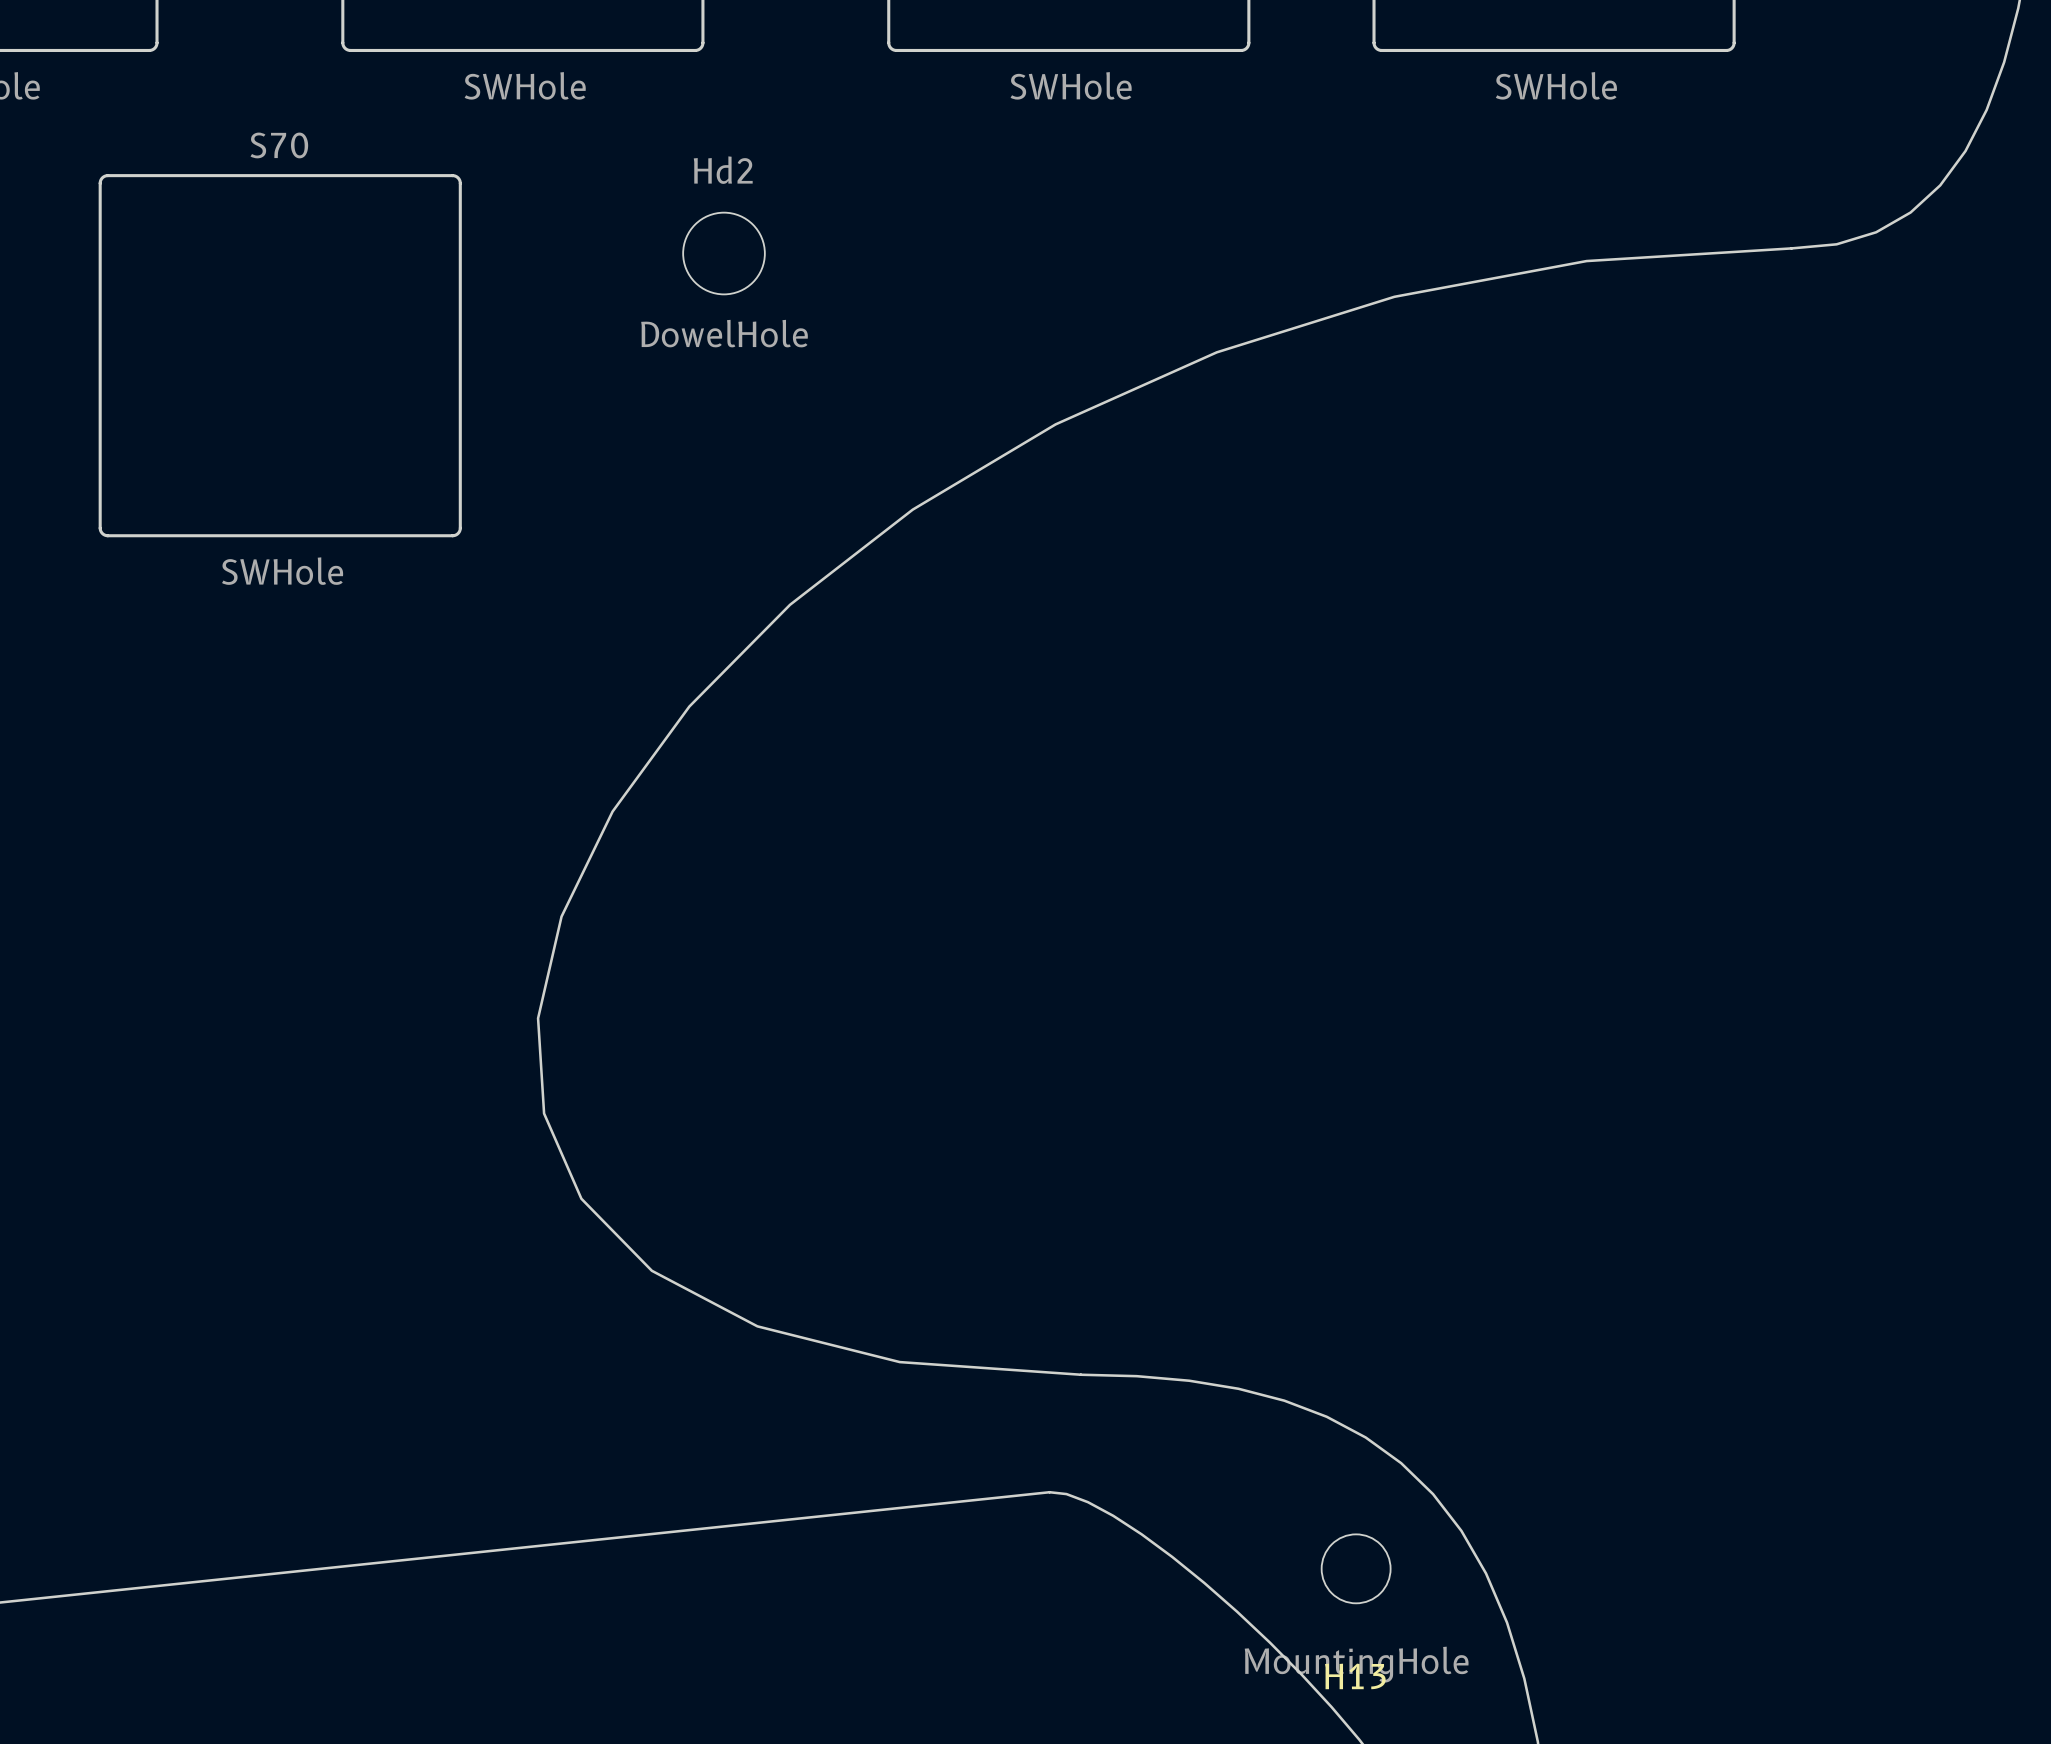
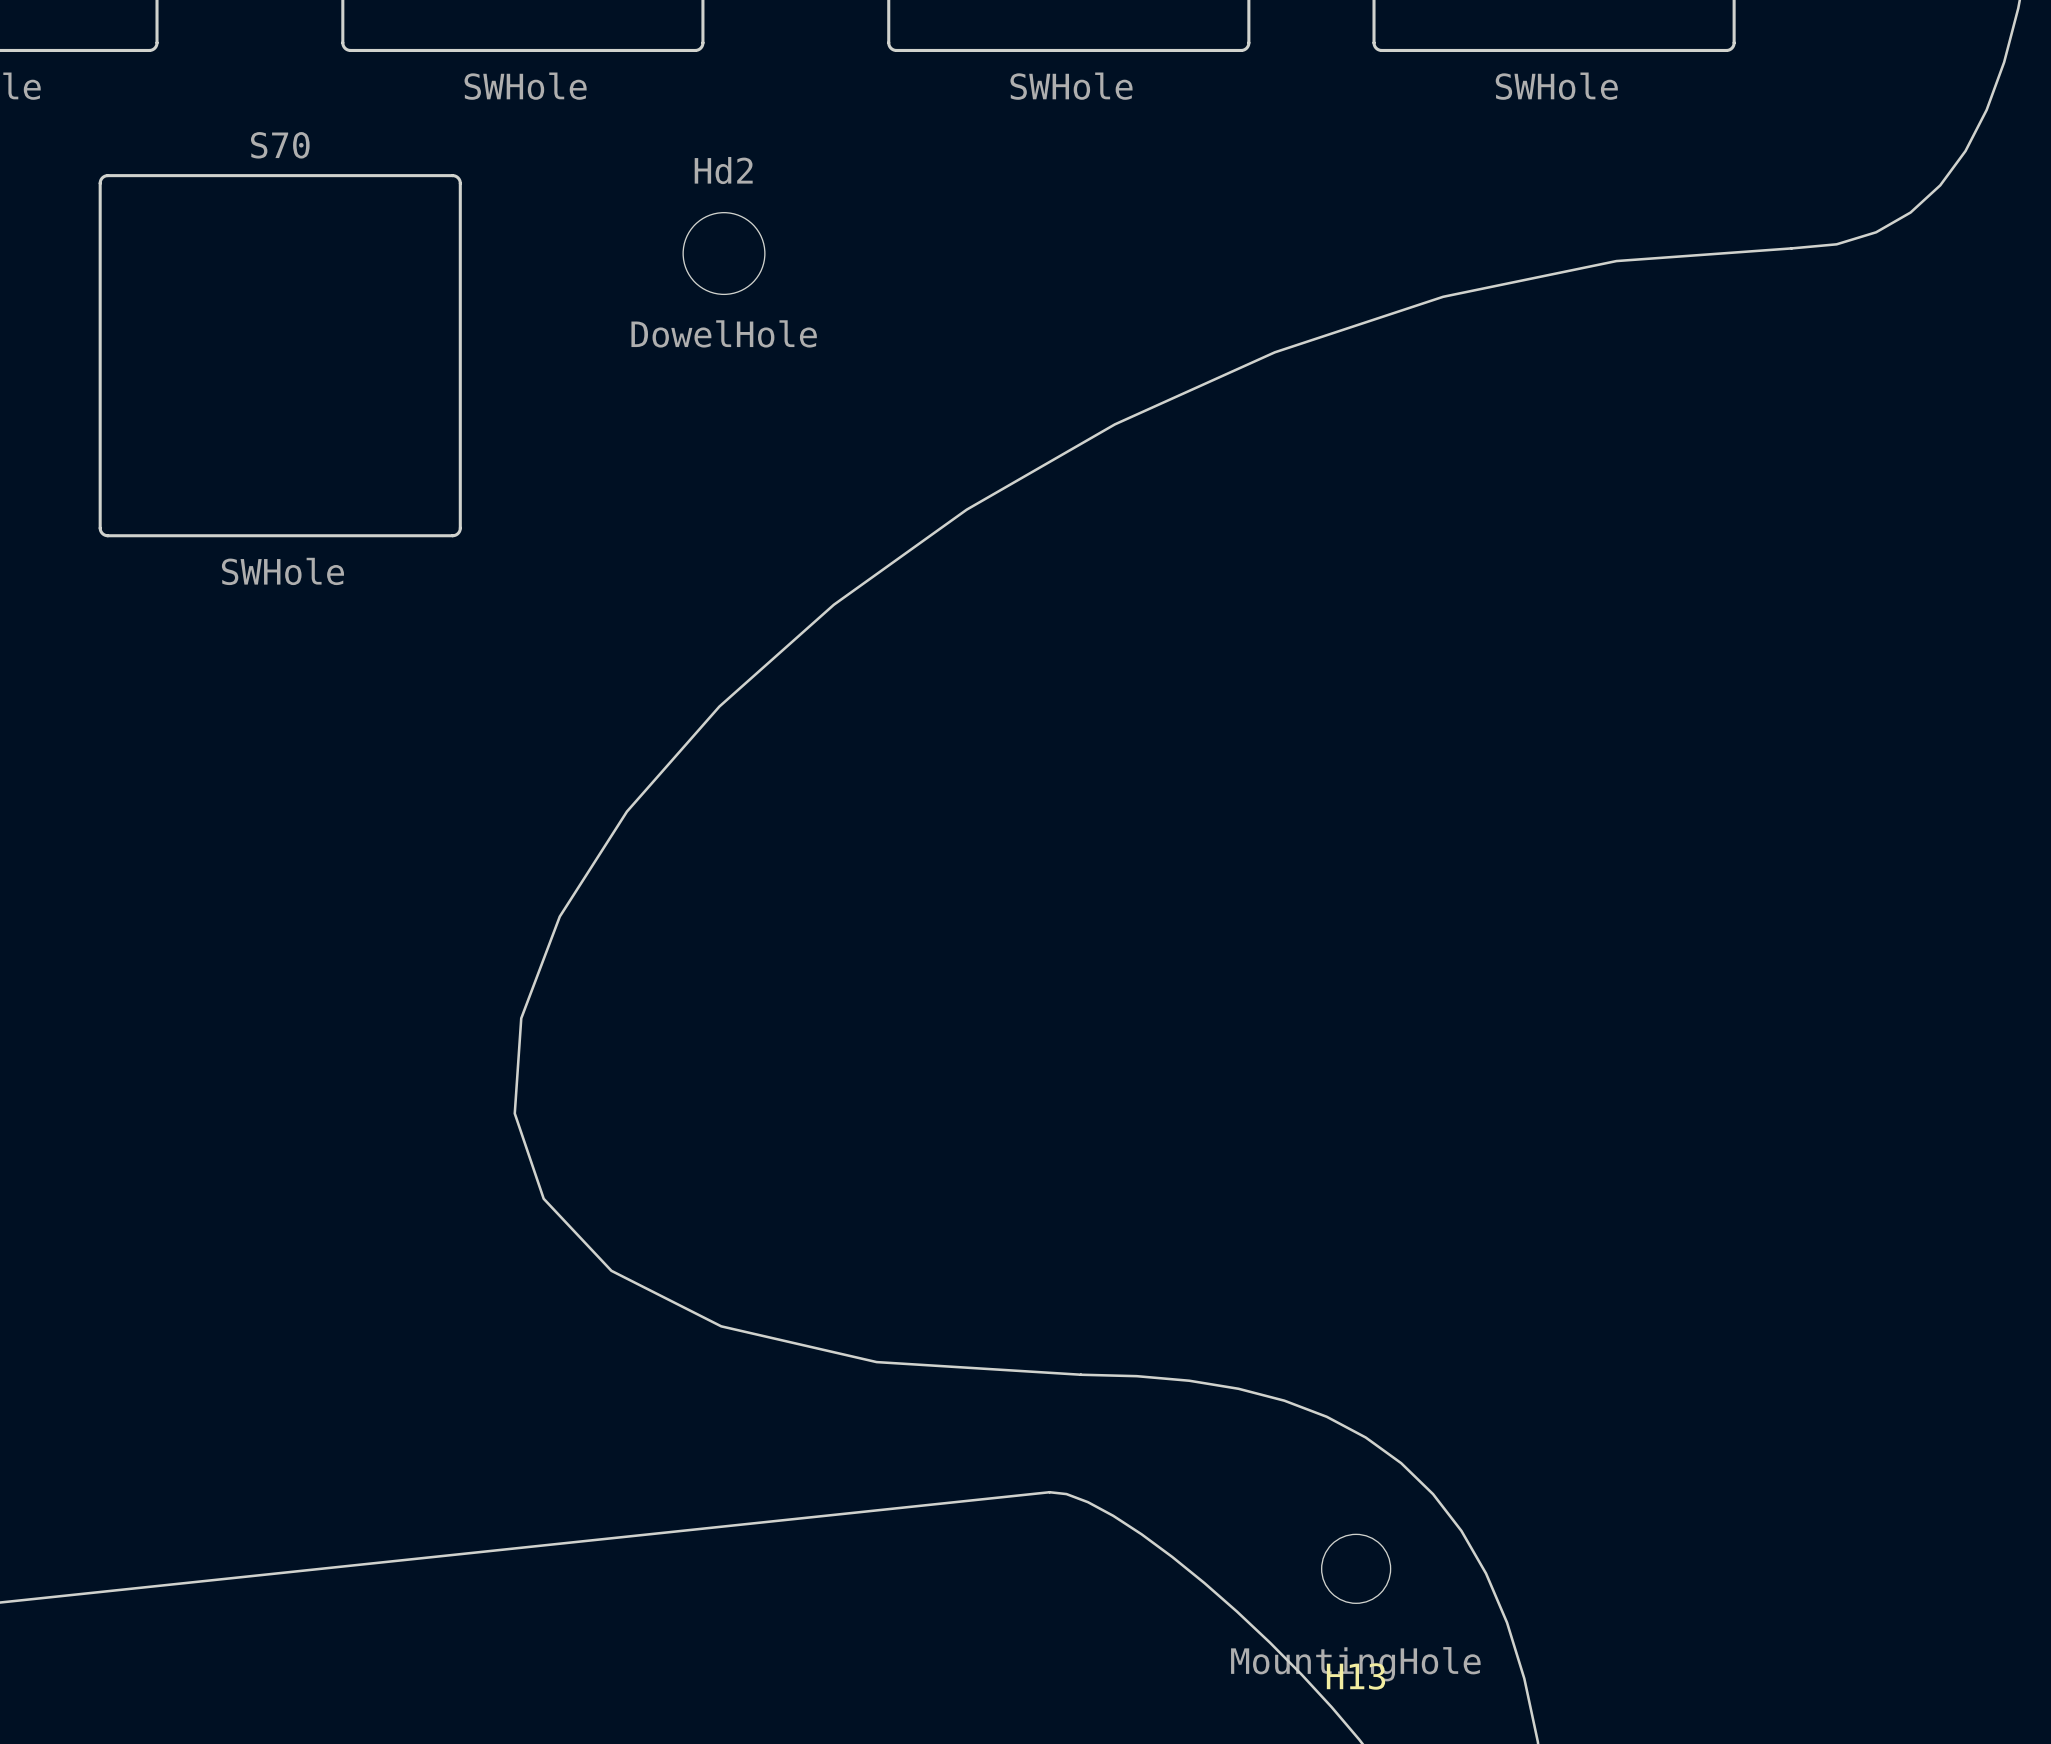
board edge: (1791, 248) (1586, 261) (1394, 296) (1216, 352) (1055, 424) (912, 509) (790, 604) (689, 706) (612, 811) (561, 916) (538, 1018) (544, 1113) (581, 1198) (651, 1270) (757, 1326) (899, 1362) (1080, 1374) -> (1791, 248) (1616, 261) (1443, 296) (1274, 352) (1114, 424) (966, 509) (833, 604) (719, 706) (626, 811) (559, 916) (521, 1018) (514, 1113) (543, 1198) (611, 1270) (721, 1326) (876, 1362) (1080, 1374)

